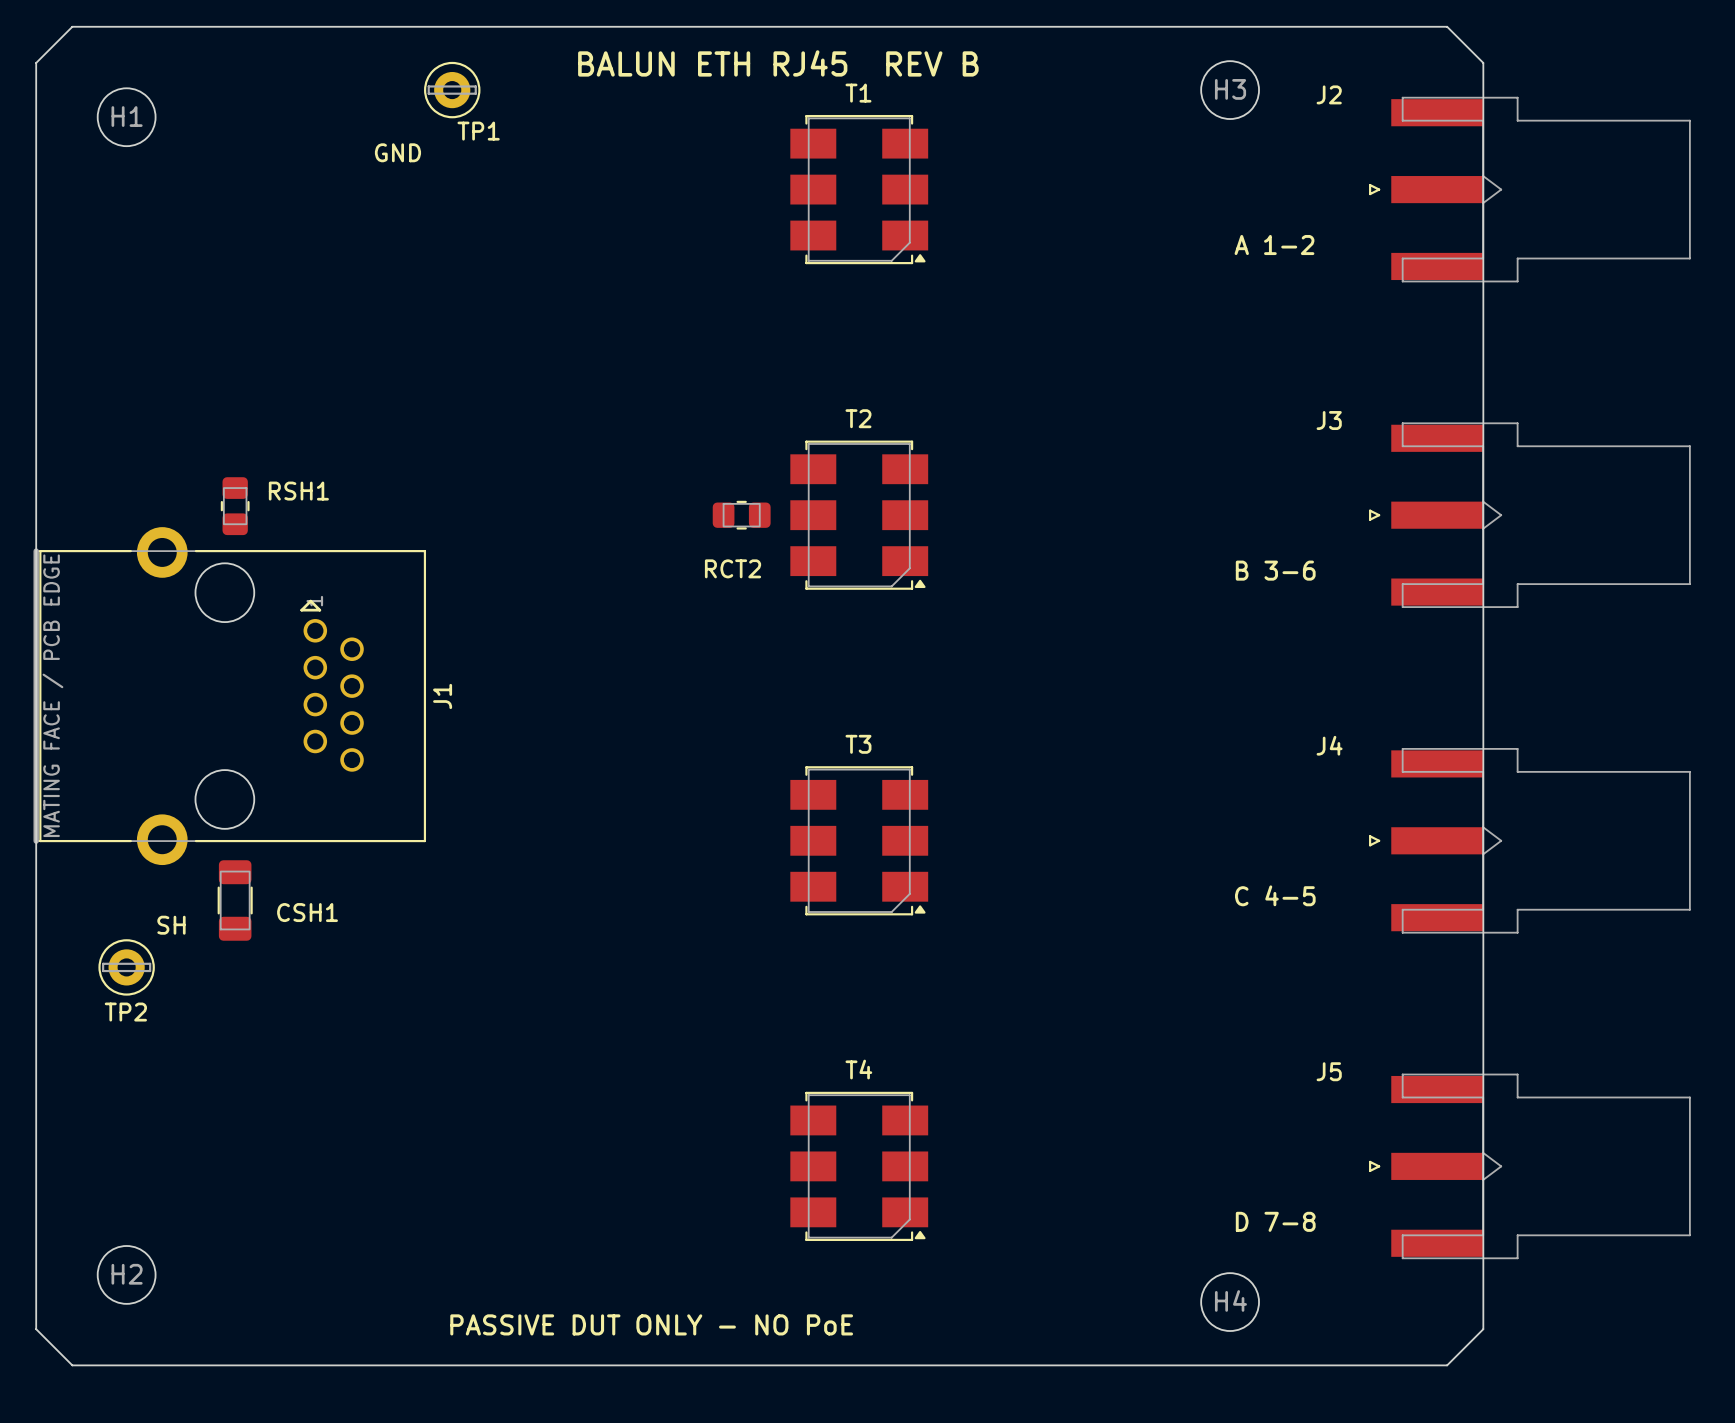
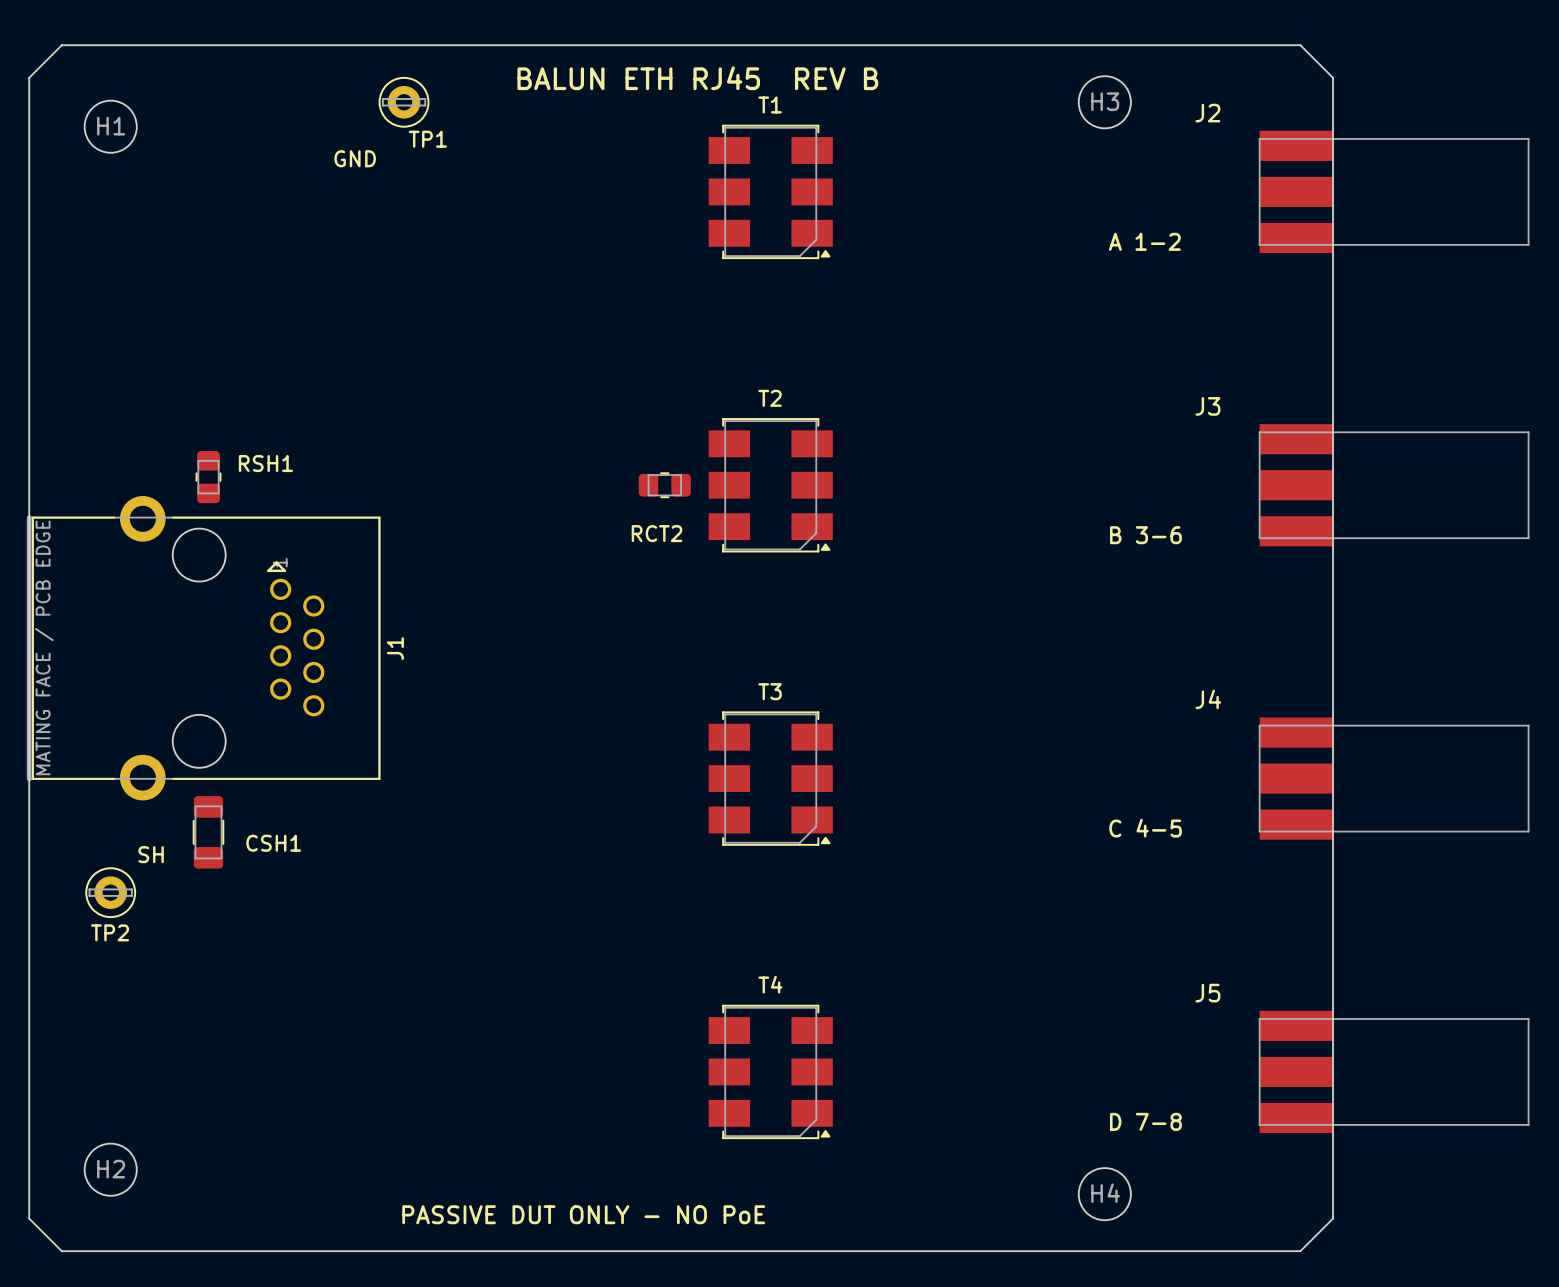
J2 footprint: [1369, 96, 1691, 283] -> [1258, 130, 1530, 254]
J3 footprint: [1369, 422, 1691, 608] -> [1258, 424, 1530, 547]
J4 footprint: [1369, 748, 1691, 934] -> [1258, 717, 1530, 840]
J5 footprint: [1369, 1073, 1691, 1260] -> [1258, 1010, 1530, 1134]

